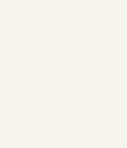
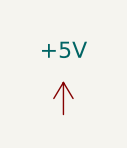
power symbol: none -> +5V (63, 98)

